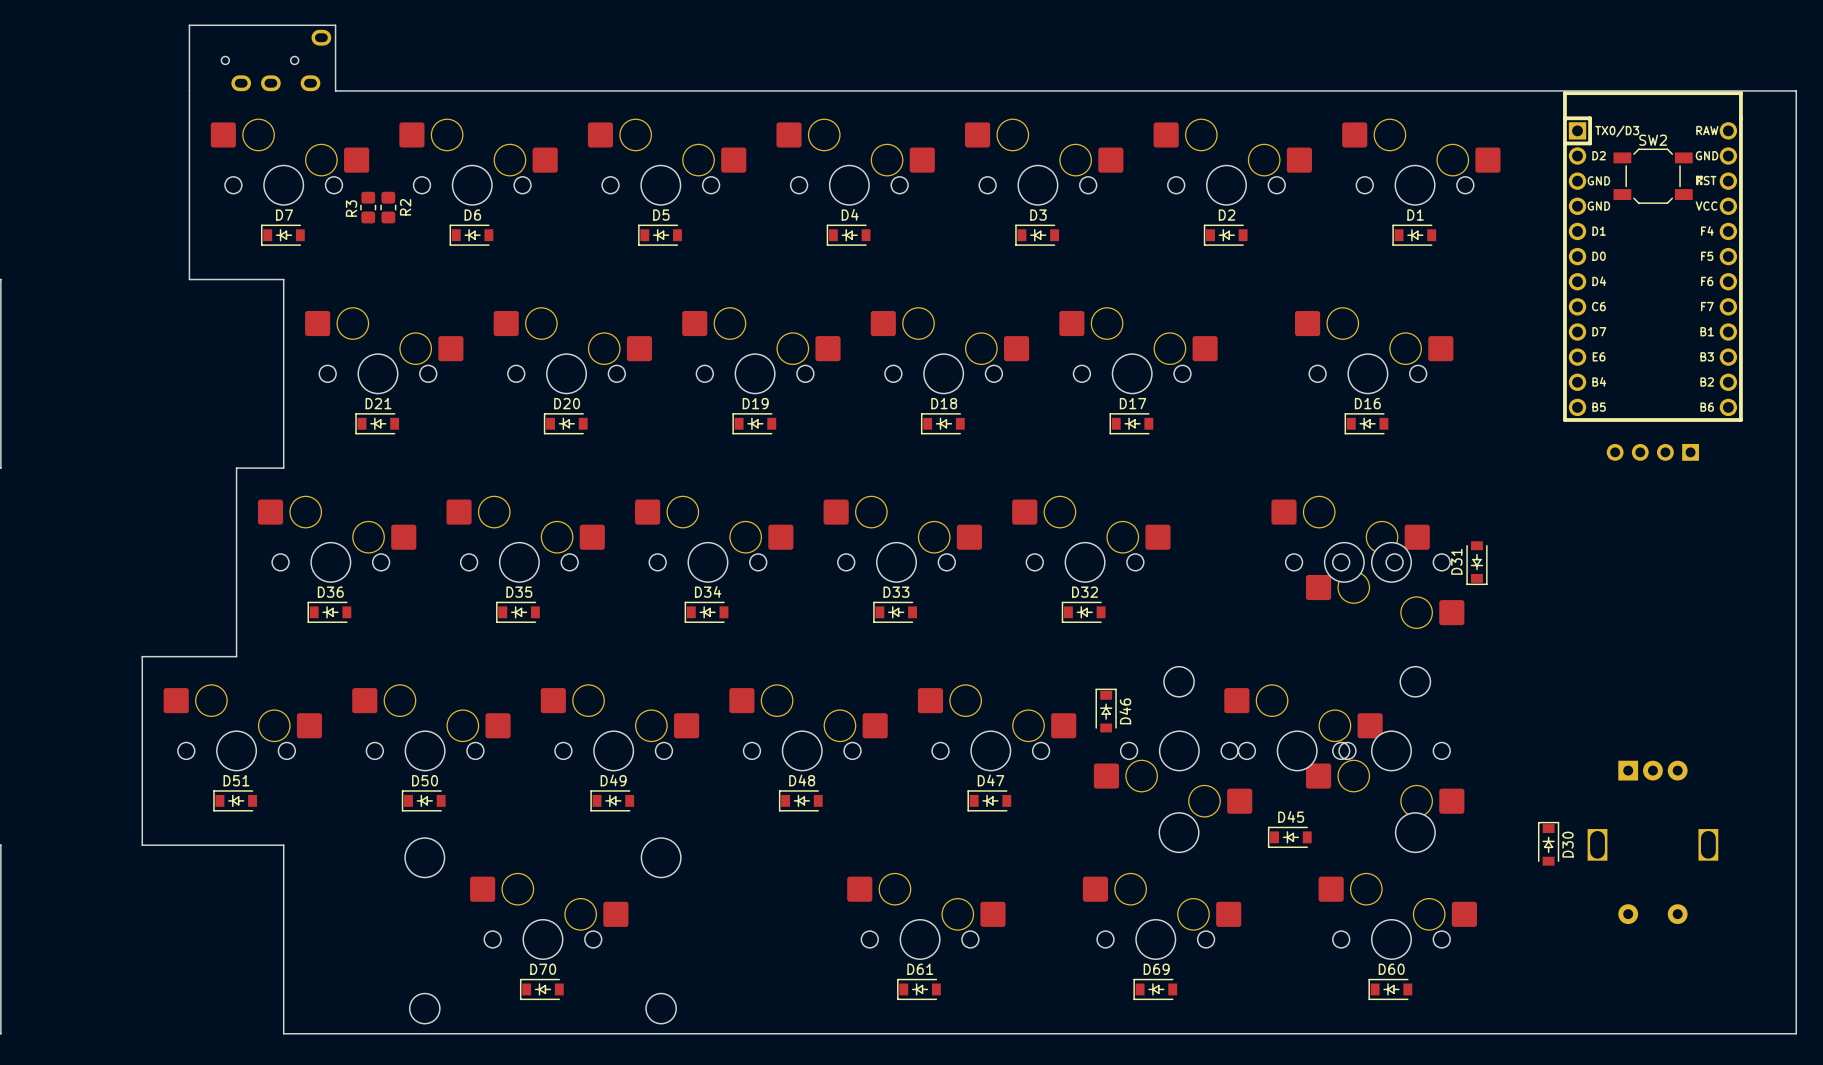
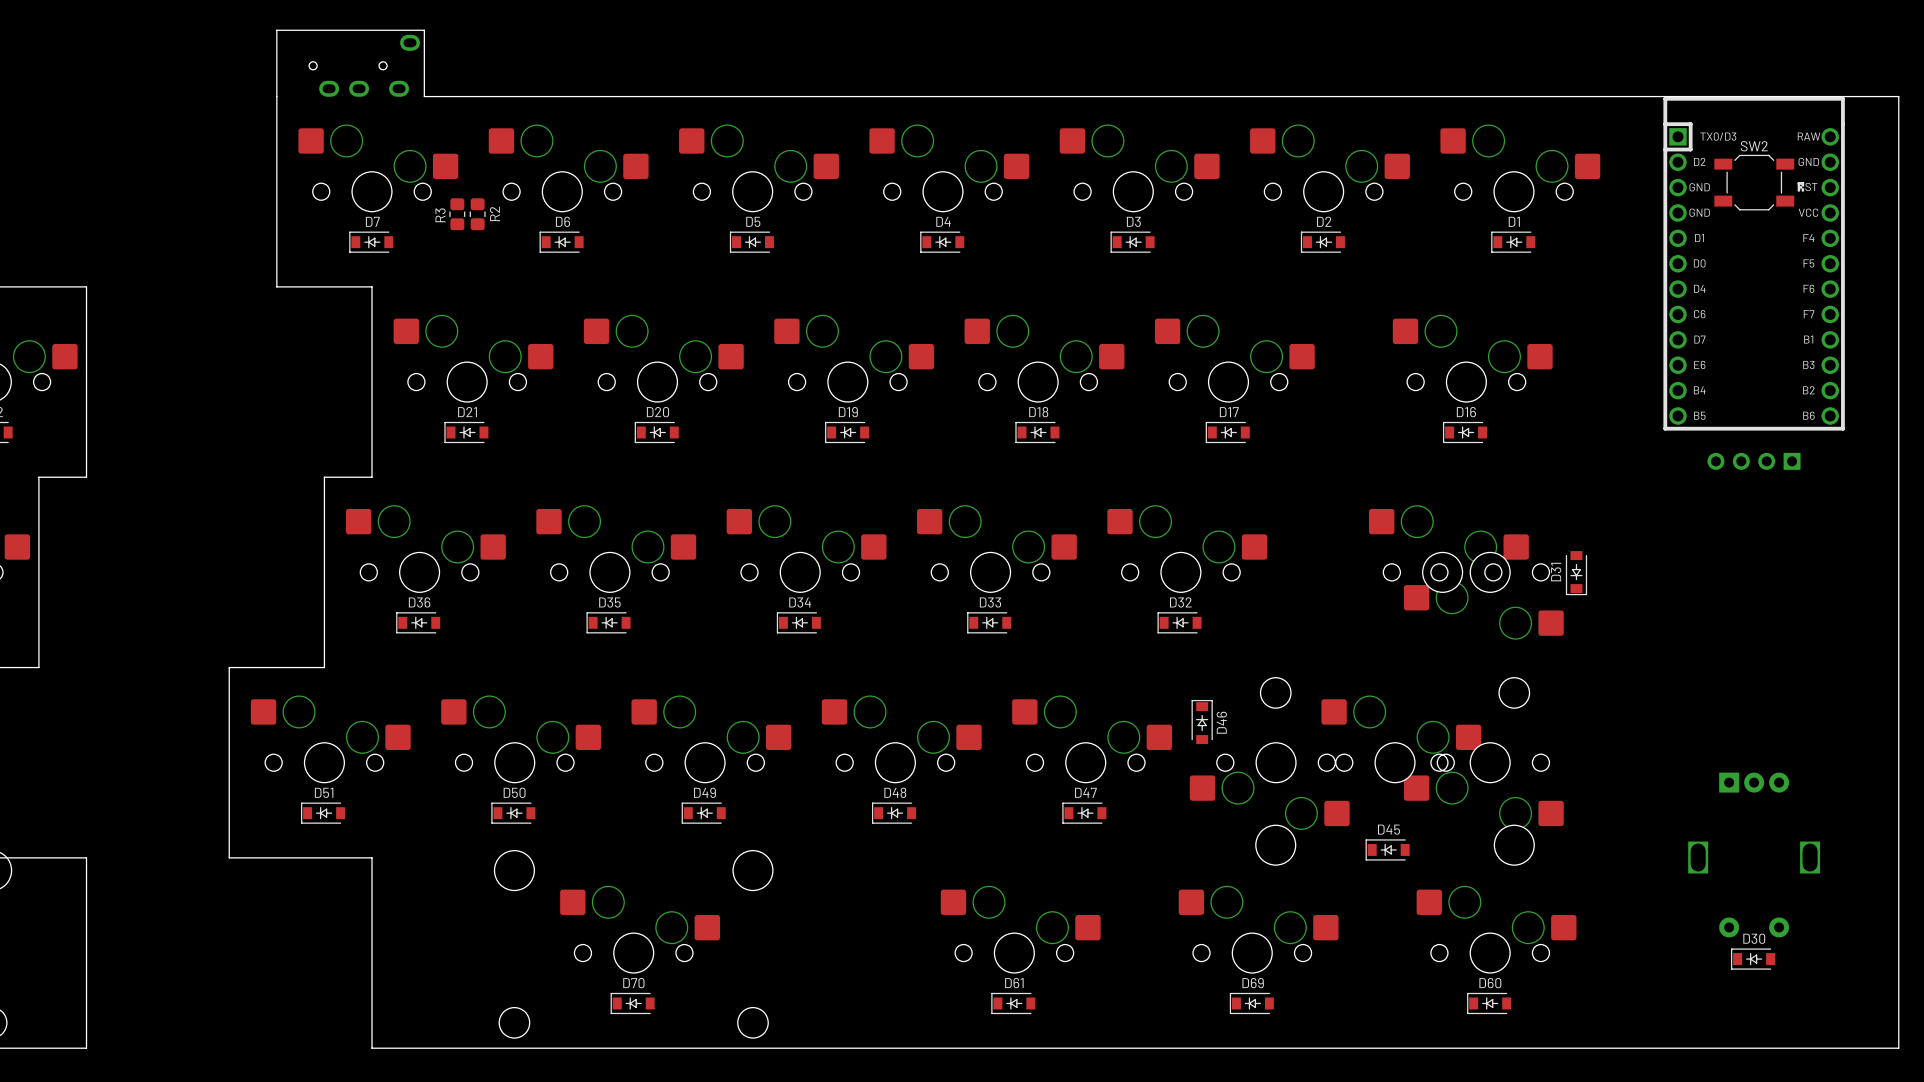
D30 rotation: 0° (1548, 843) -> 90° counterclockwise (1753, 959)
D30 position: (1548, 843) -> (1753, 959)

